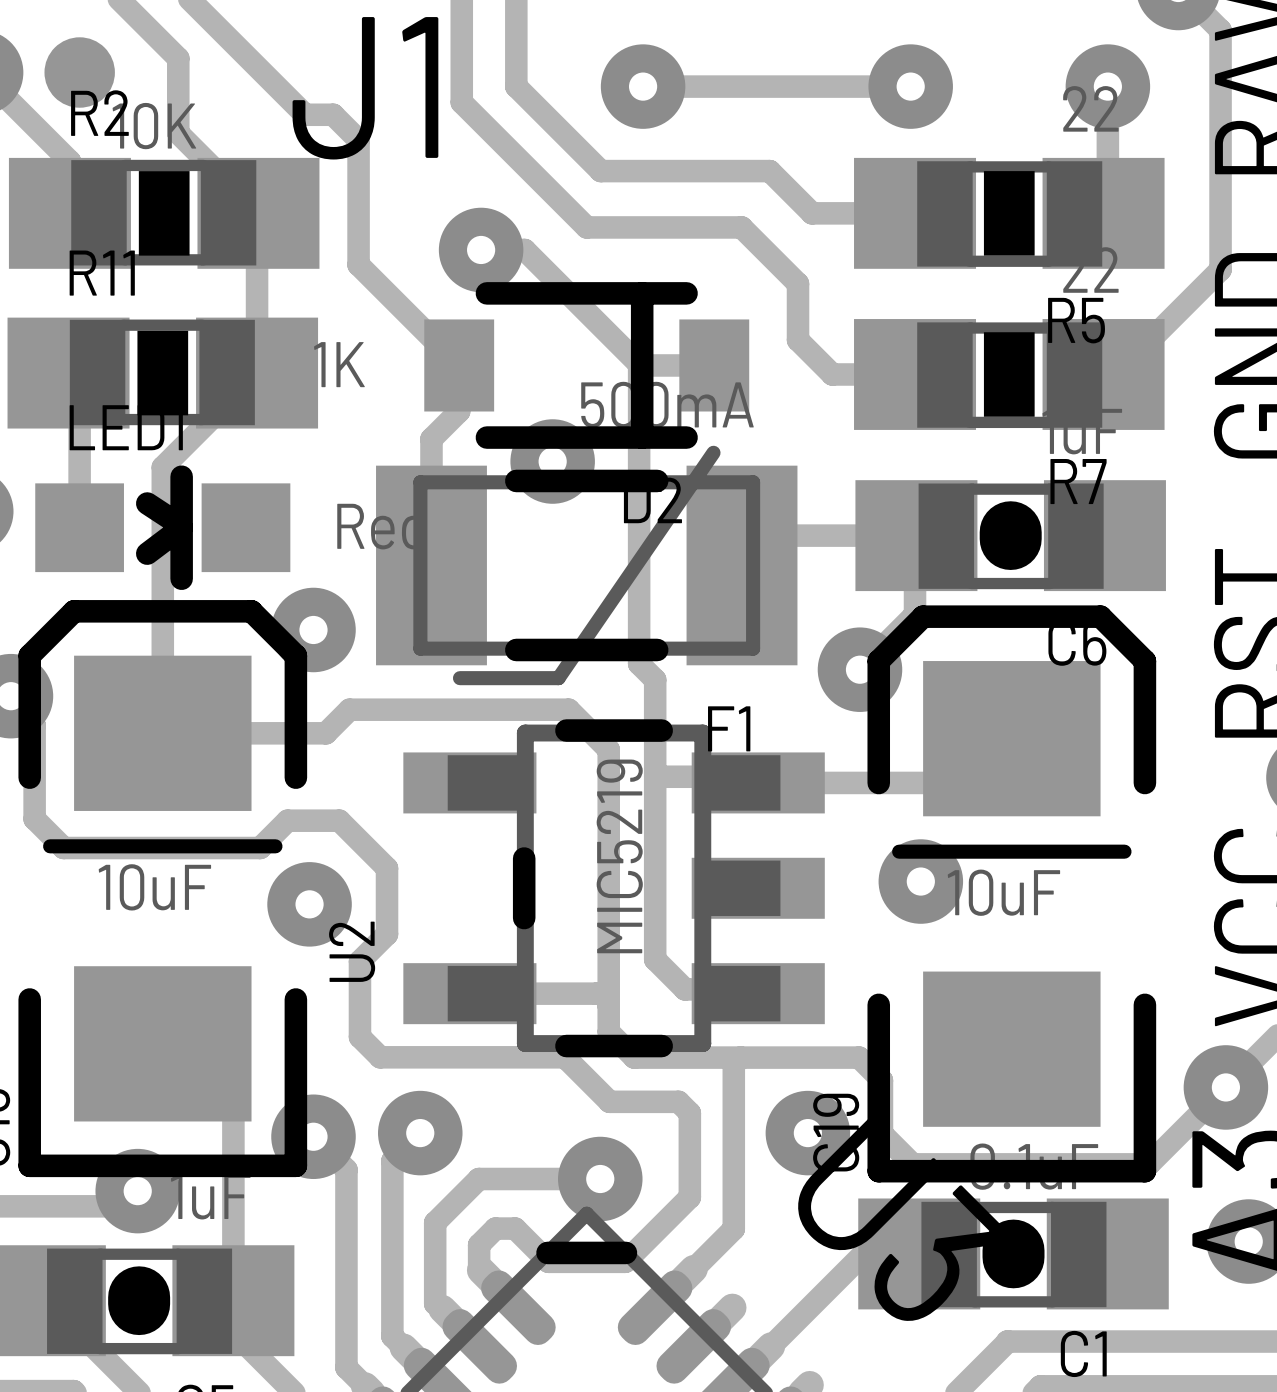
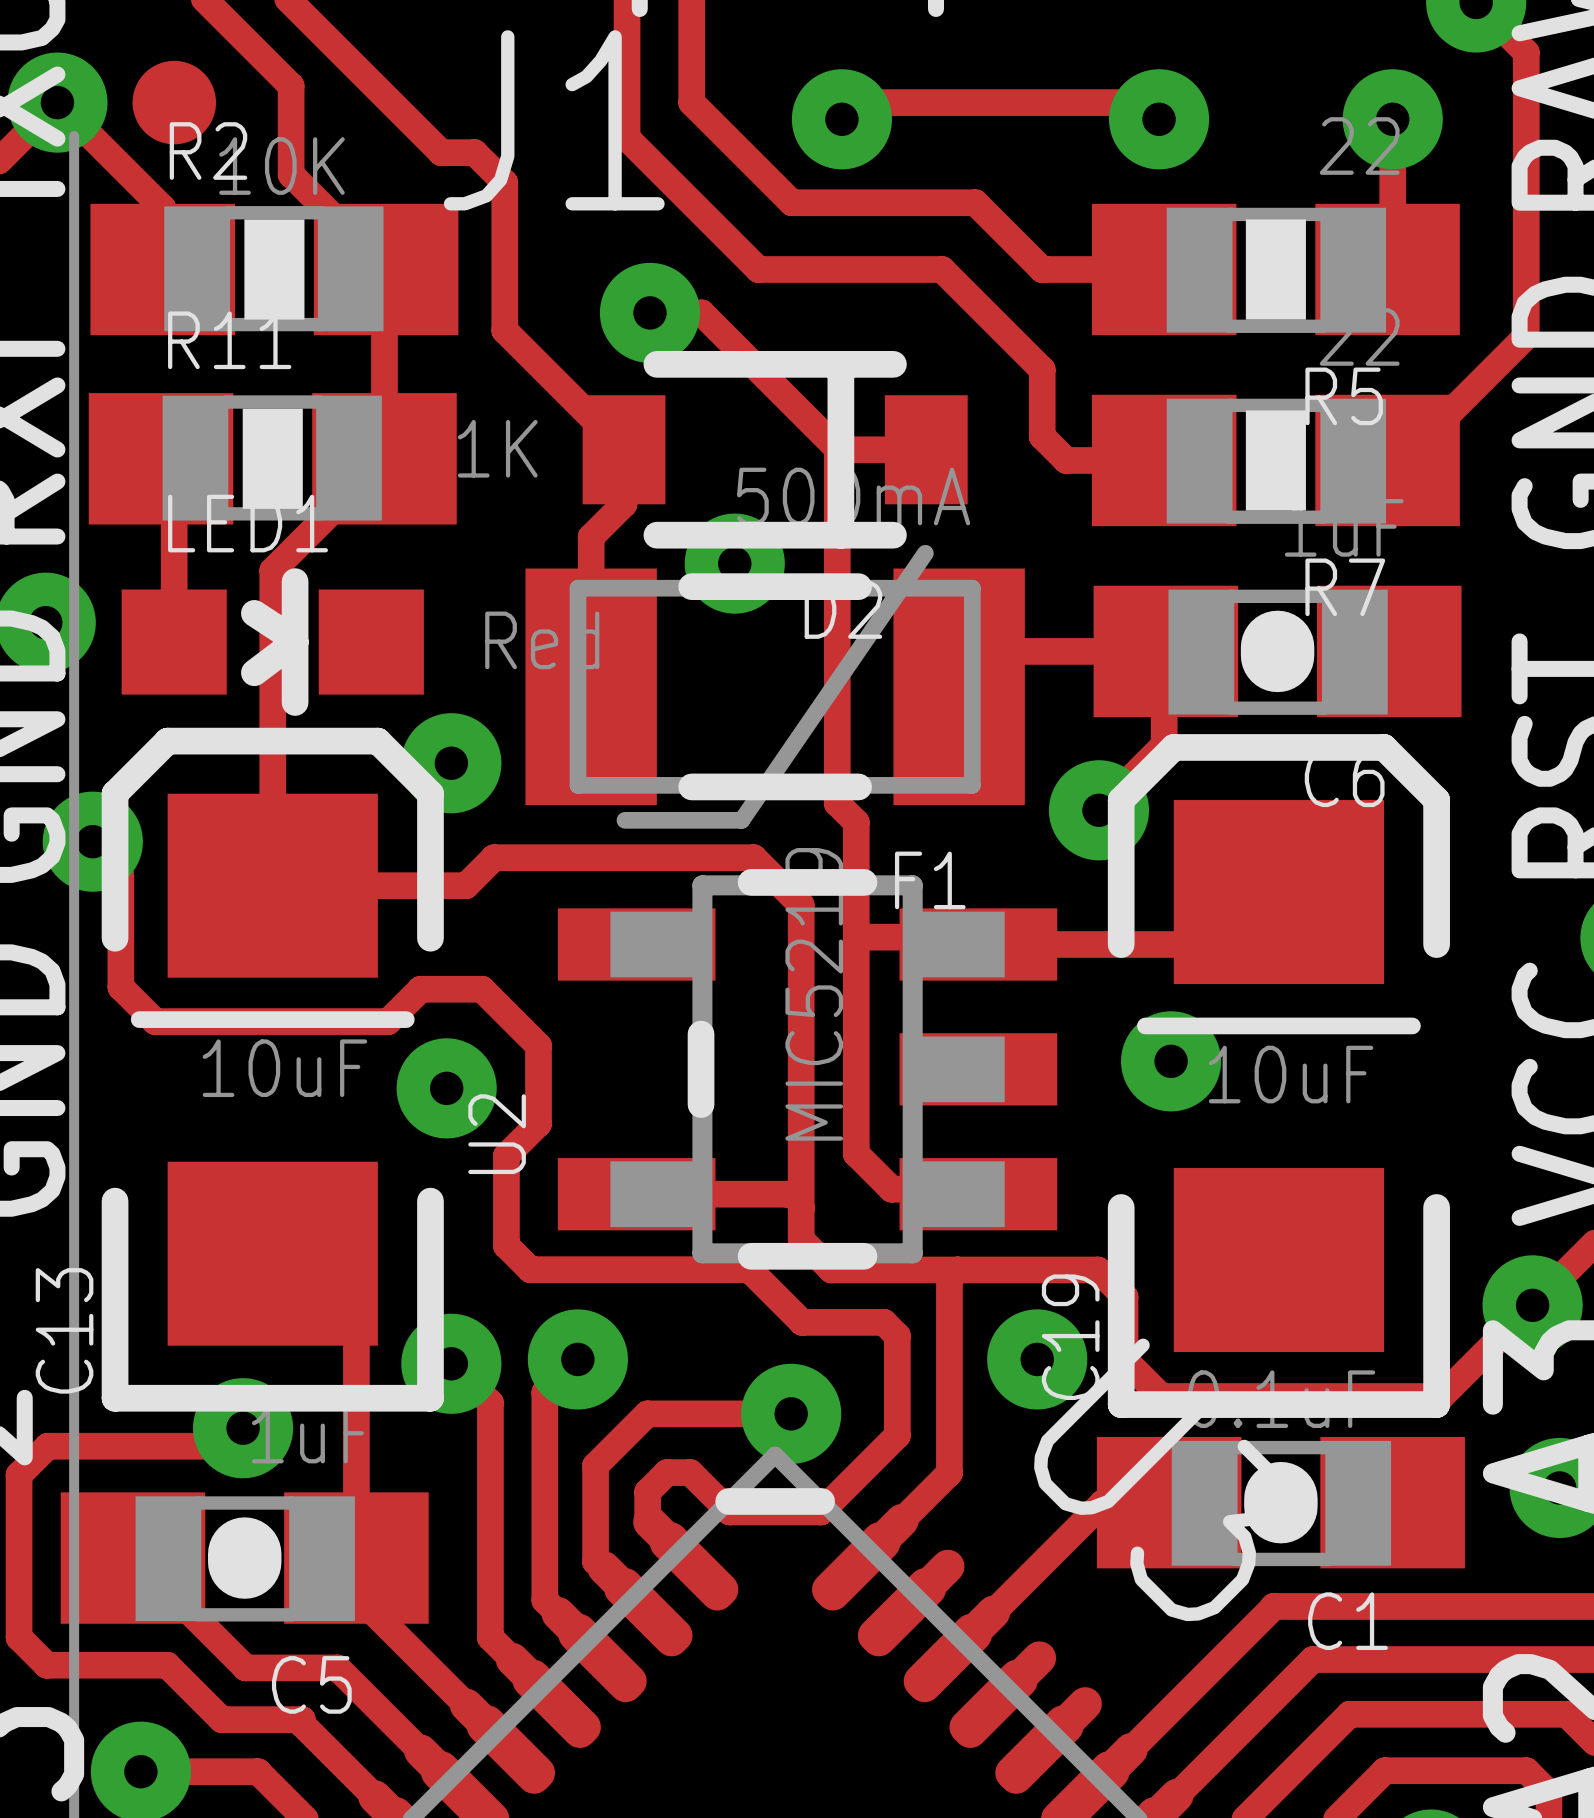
track: (516, 72) (516, 86) (600, 171) (769, 171) -> (691, 102) (791, 202) (975, 202) (992, 219)
track: (643, 86) (910, 86) -> (841, 102) (1159, 102)
track: (572, 213) (586, 227) (741, 227) -> (758, 269) (942, 269) (958, 286)
track: (798, 283) (798, 340) (812, 354) -> (1025, 352) (1042, 369) (1042, 436)

